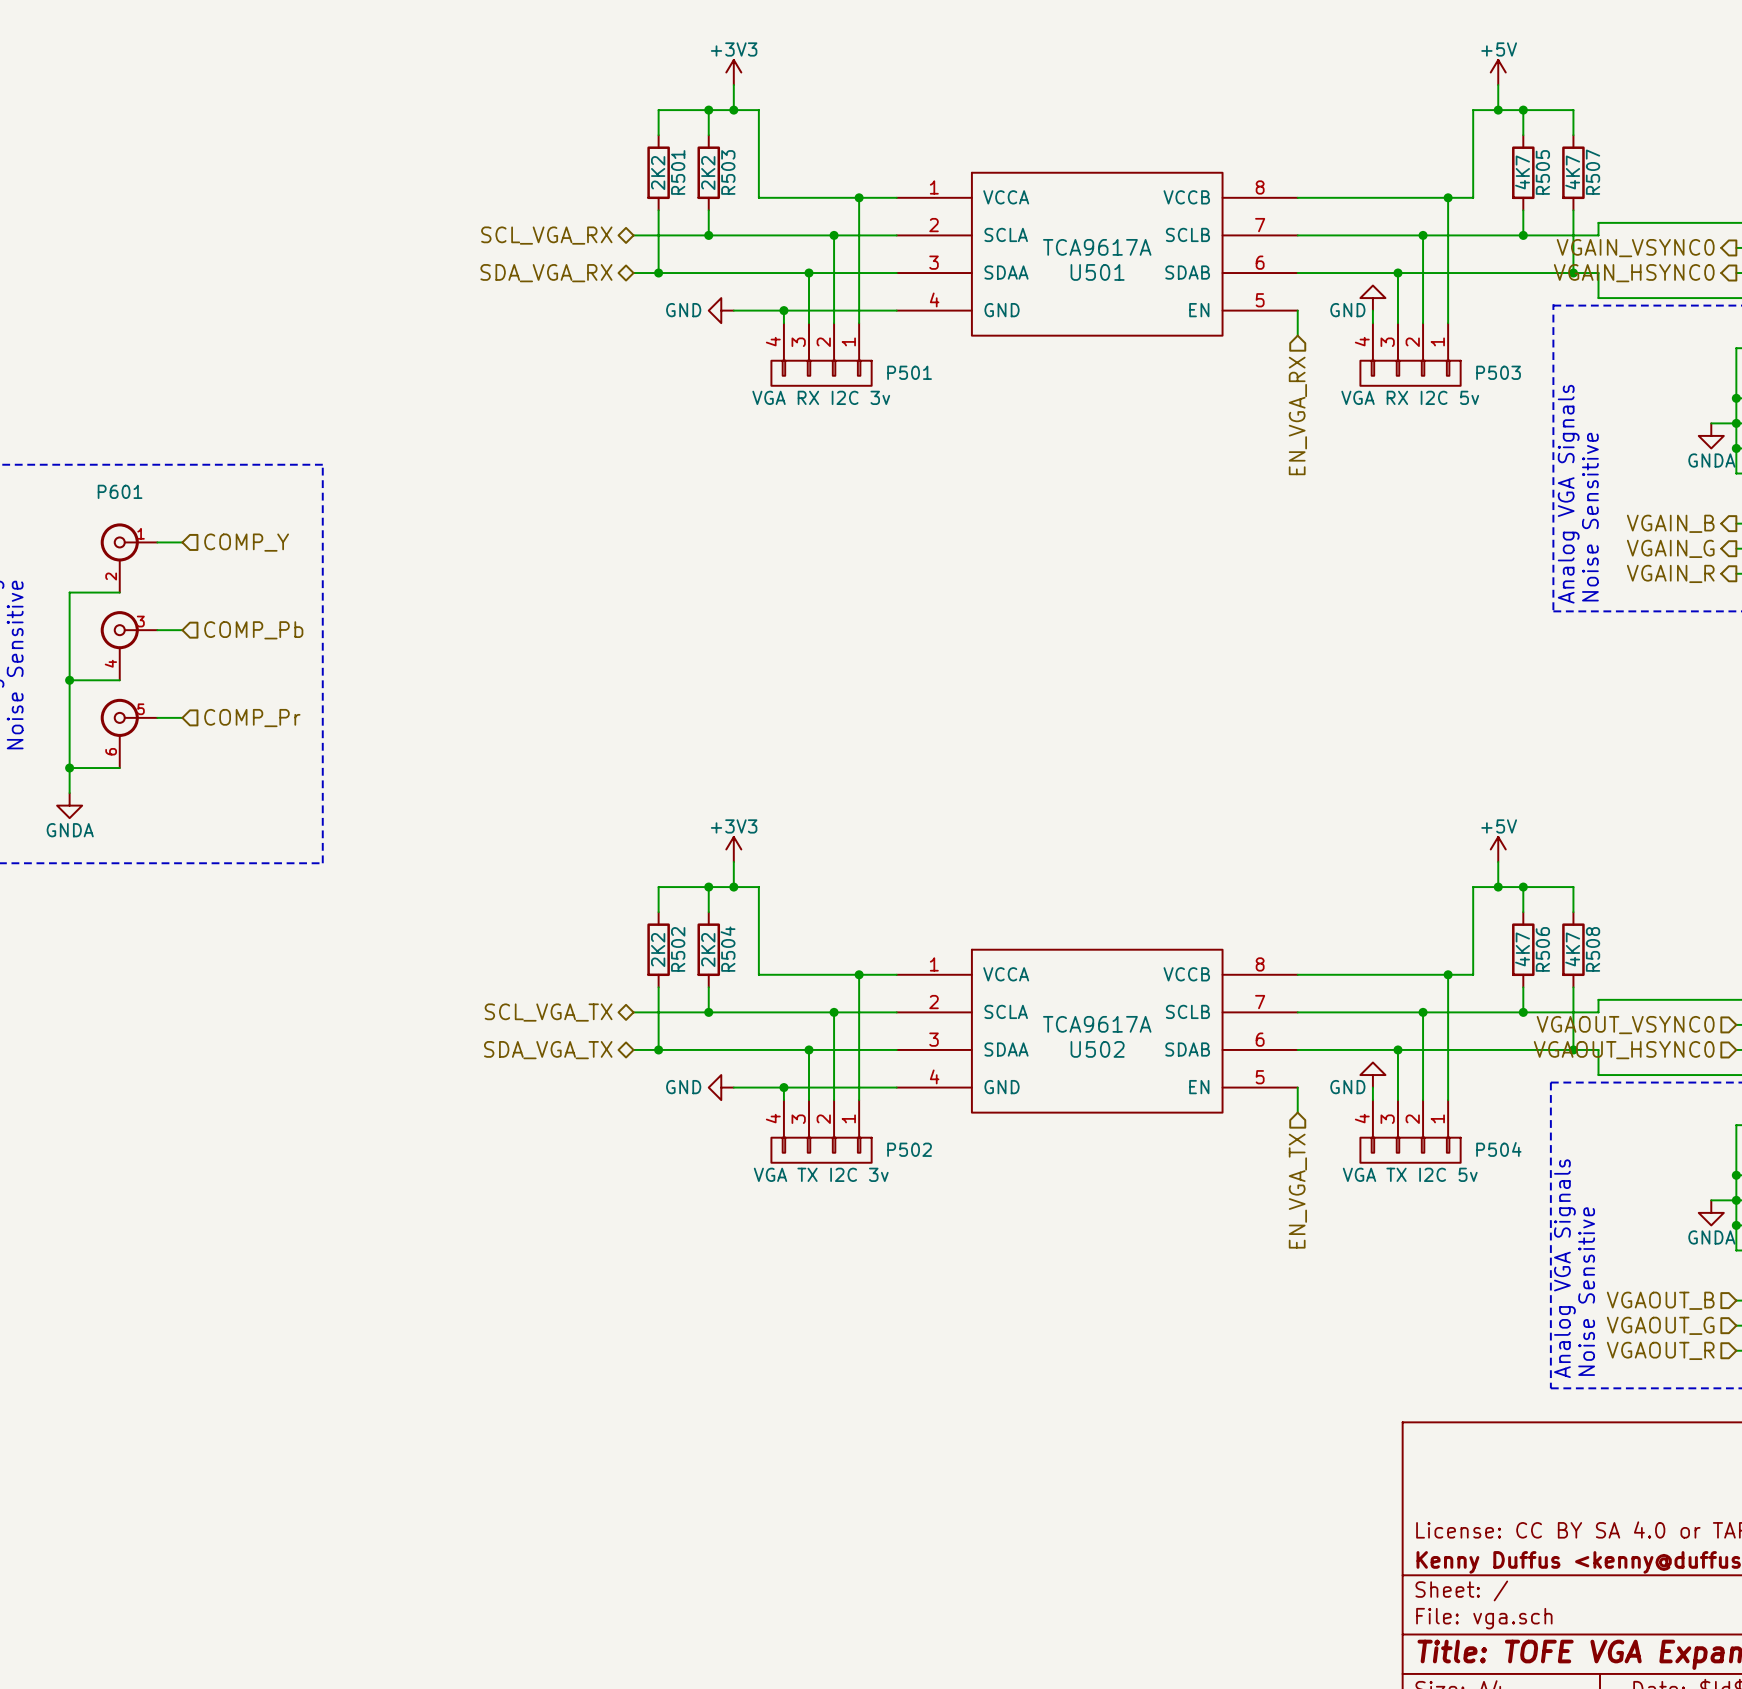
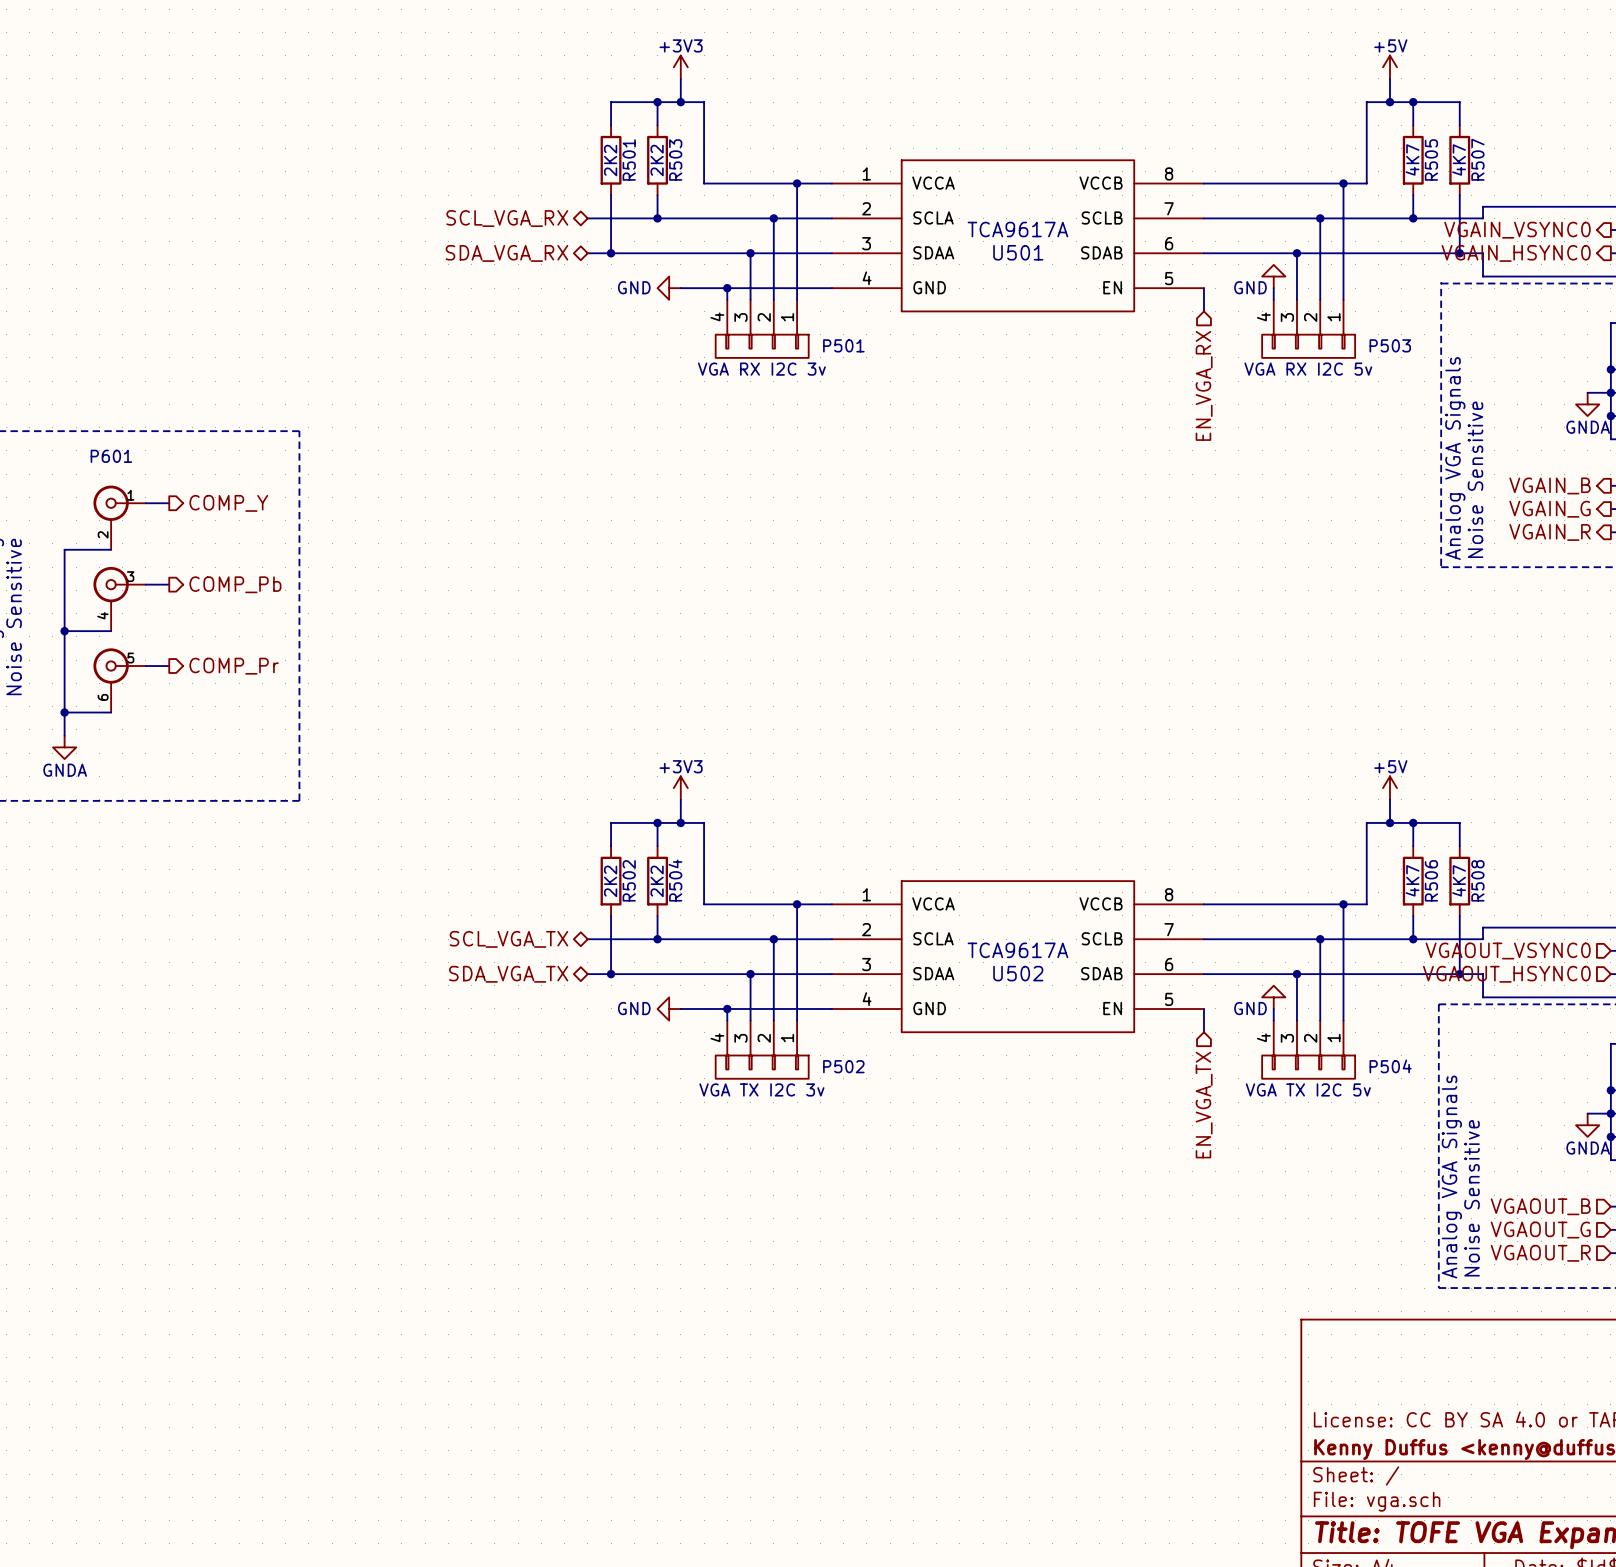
hierarchical label shape: input (246, 542) -> output (228, 503)
hierarchical label shape: input (253, 630) -> output (235, 584)
hierarchical label shape: input (252, 718) -> output (234, 666)

